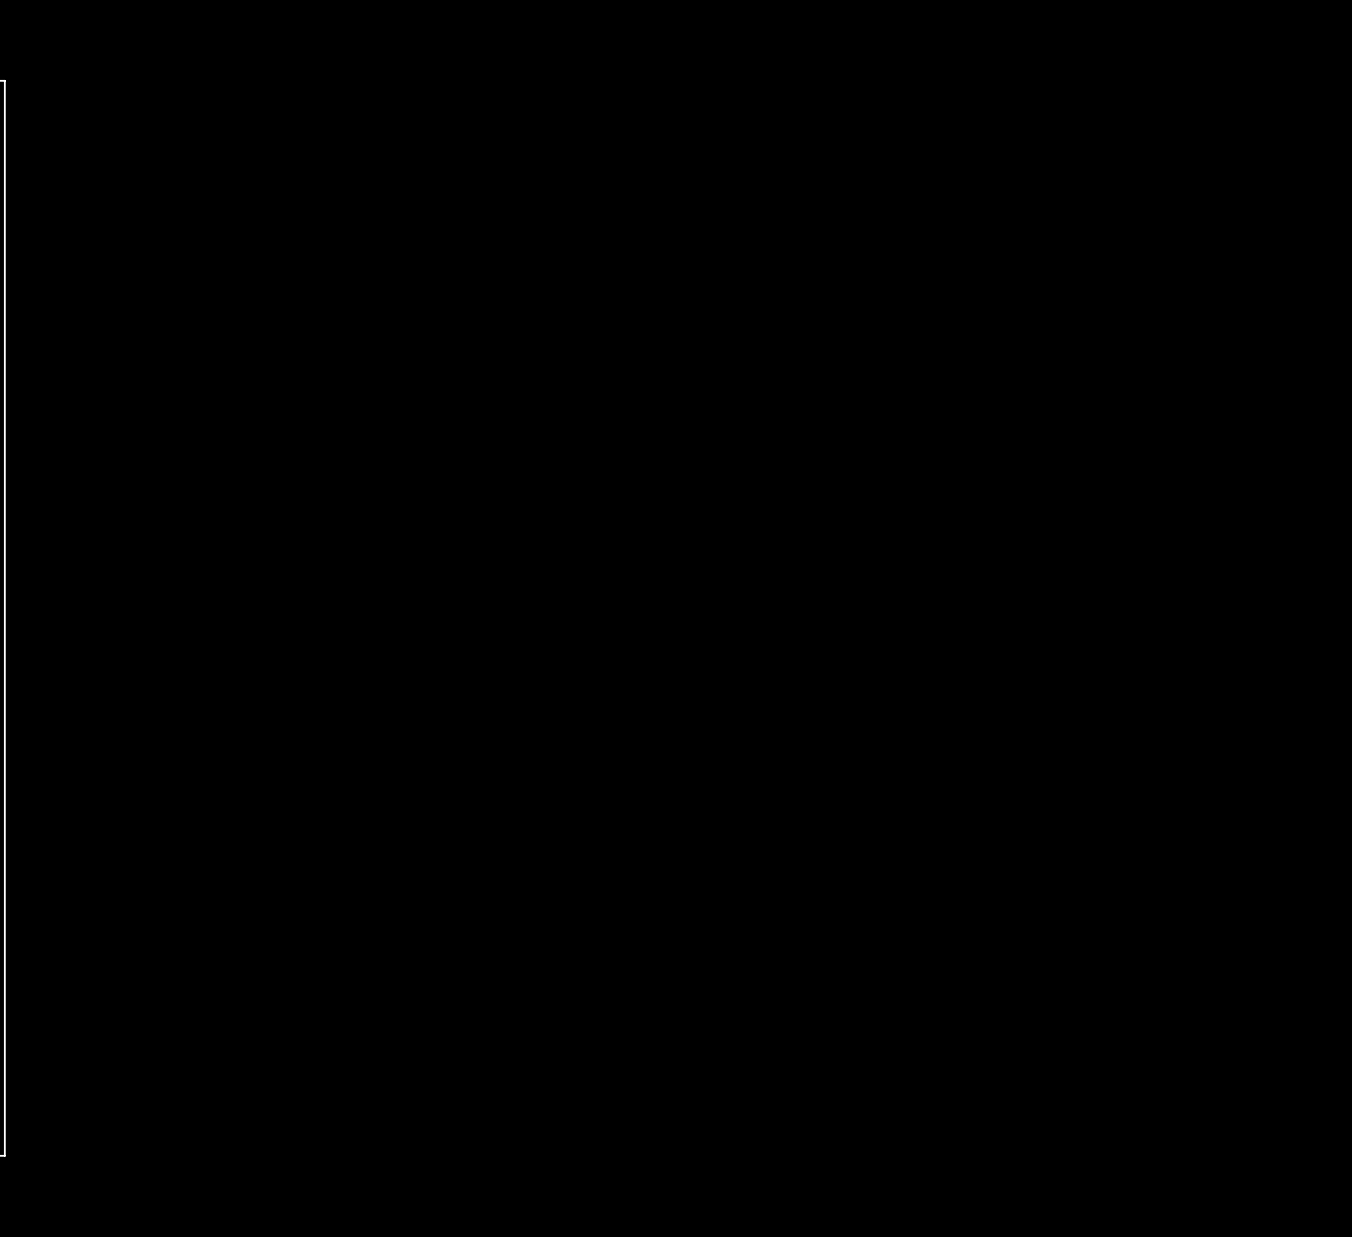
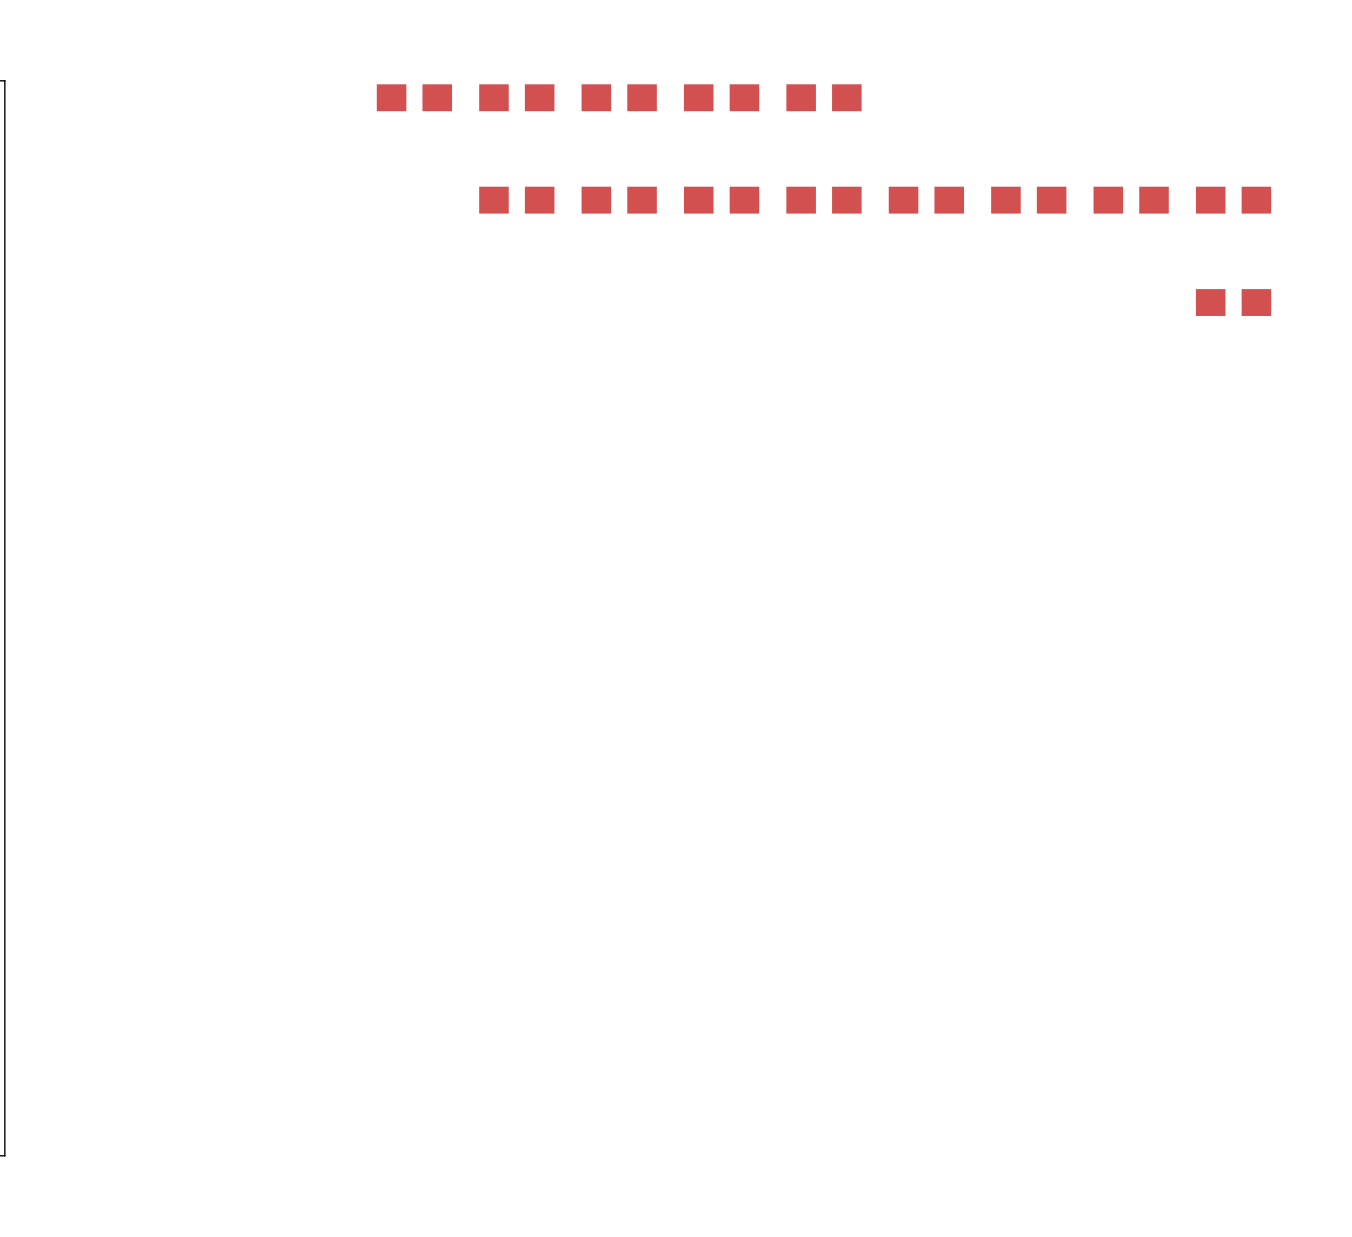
part: none -> (414, 97)
part: none -> (516, 97)
part: none -> (619, 97)
part: none -> (721, 97)
part: none -> (823, 97)
part: none -> (516, 200)
part: none -> (619, 200)
part: none -> (721, 200)
part: none -> (823, 200)
part: none -> (926, 200)
part: none -> (1028, 200)
part: none -> (1131, 200)
part: none -> (1233, 200)
part: none -> (1233, 302)

